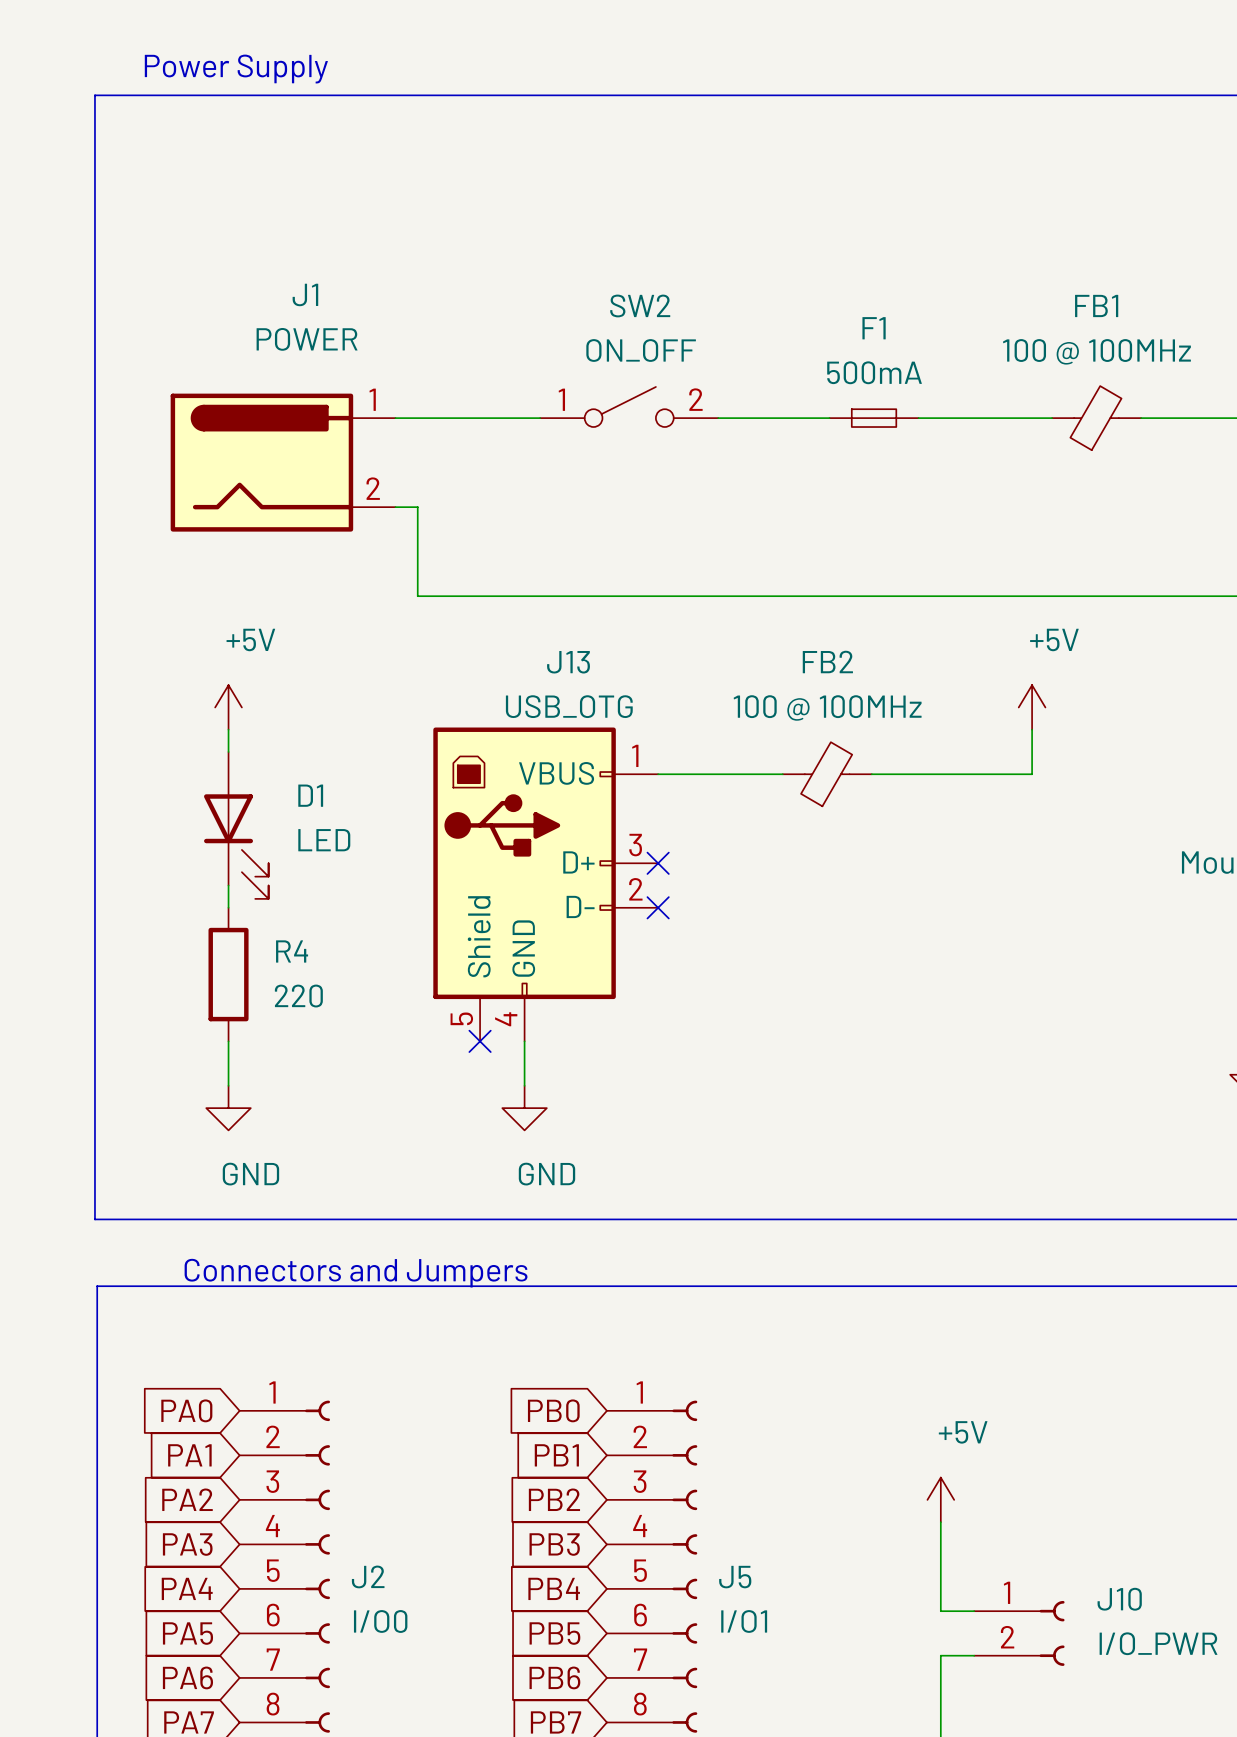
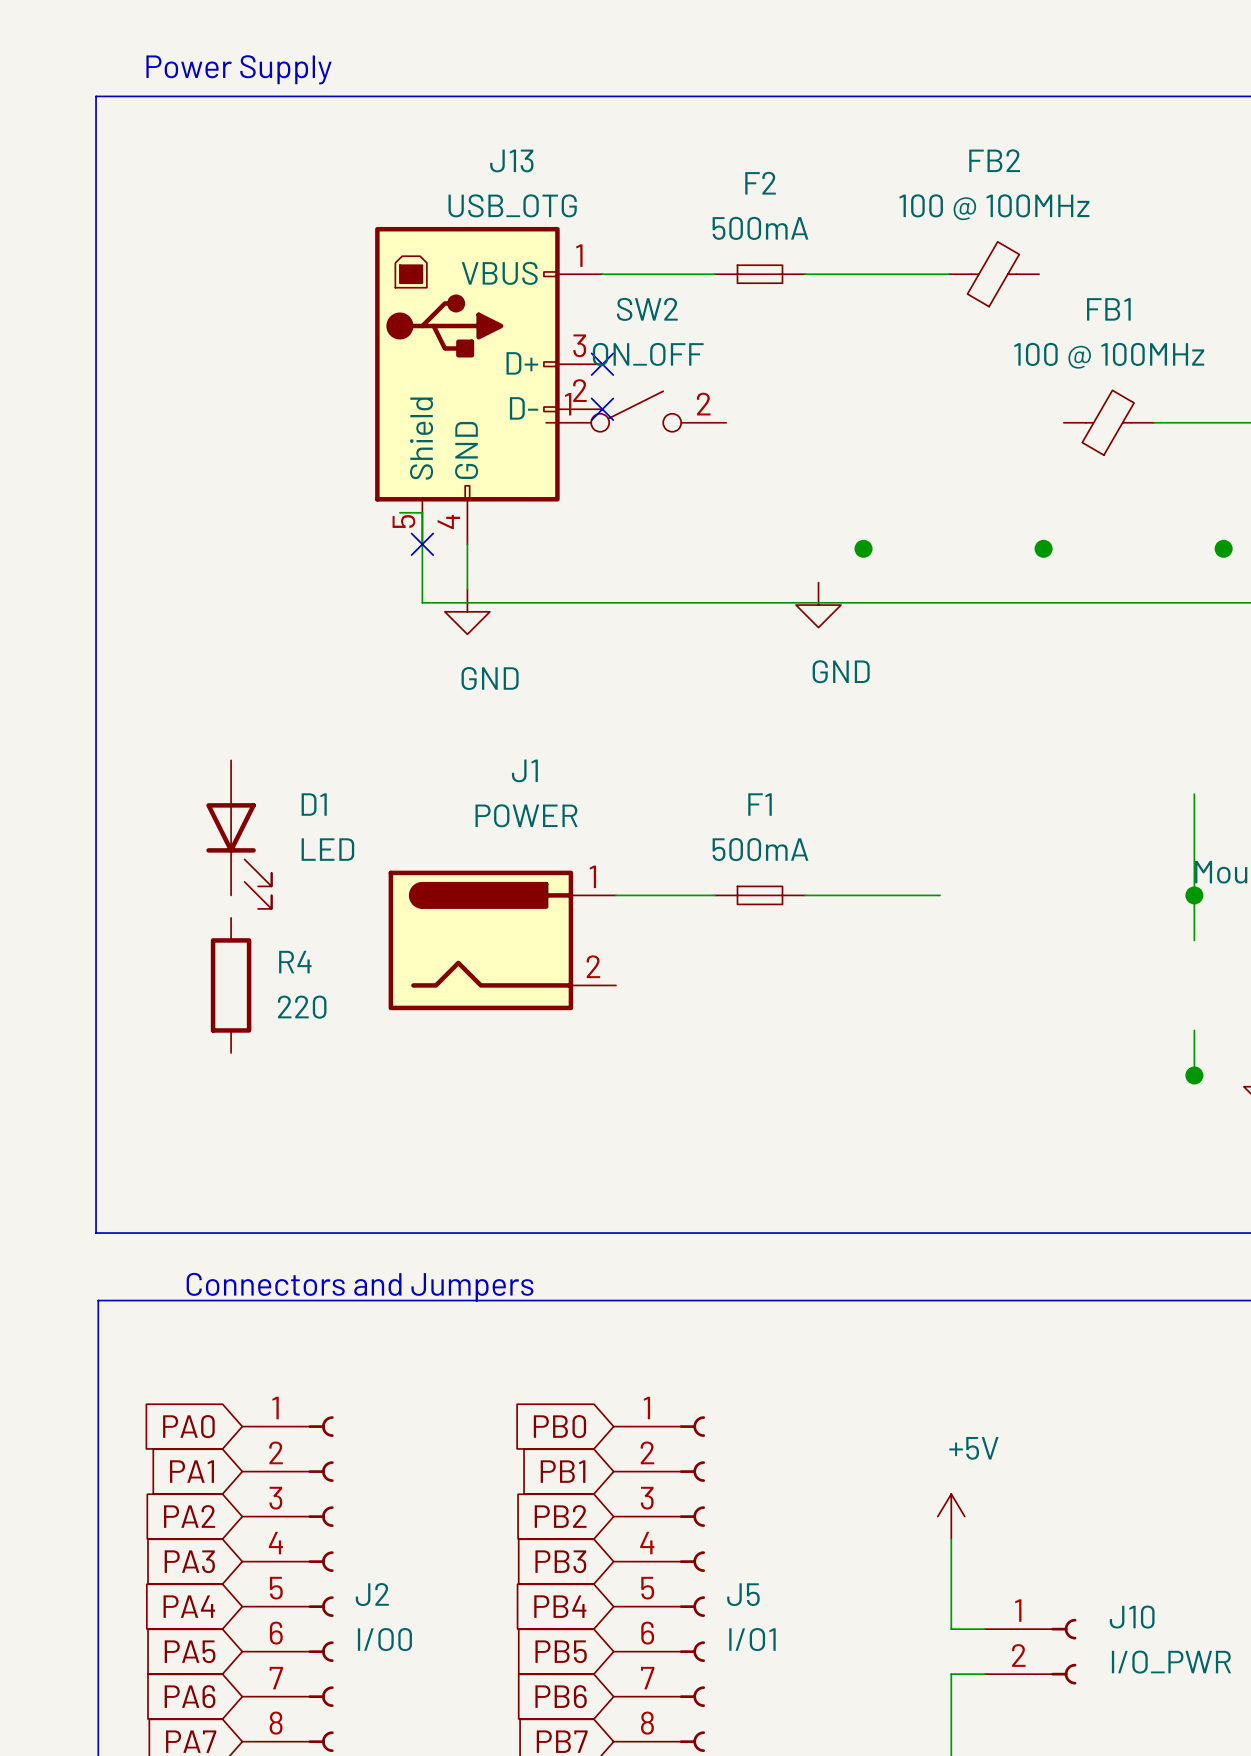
F2: none -> 500mA (759, 274)
wire: none -> (805, 274) (949, 274)
no-connect mark: none -> (602, 364)
no-connect mark: none -> (602, 409)
wire: (718, 418) (829, 418) -> (602, 274) (714, 274)
F1 position: (874, 418) -> (759, 895)
wire: (918, 418) (1052, 418) -> none
J1 position: (283, 462) -> (502, 940)
no-connect mark: none -> (422, 544)
wire: none -> (467, 544) (467, 589)
junction: none -> (863, 548)
junction: none -> (1043, 548)
junction: none -> (1223, 548)
power symbol: none -> GND (818, 605)
power symbol: none -> GND (467, 611)
power symbol: +5V (228, 707) -> none
power symbol: +5V (1032, 707) -> none
wire: (228, 729) (228, 751) -> none
wire: (1032, 729) (1032, 774) (871, 774) -> none
wire: (658, 774) (782, 774) -> none
FB2 position: (827, 774) -> (994, 274)
wire: none -> (1194, 794) (1194, 940)
no-connect mark: (658, 863) -> none
J13 position: (545, 884) -> (488, 385)
wire: (228, 885) (228, 907) -> none
wire: none -> (615, 895) (714, 895)
wire: none -> (805, 895) (940, 895)
junction: none -> (1194, 895)
no-connect mark: (658, 907) -> none
wire: none -> (1194, 1030) (1194, 1075)
wire: (228, 1041) (228, 1085) -> none
no-connect mark: (480, 1041) -> none
wire: (524, 1041) (524, 1085) -> none
junction: none -> (1194, 1075)
power symbol: GND (228, 1108) -> none
power symbol: GND (524, 1108) -> none

